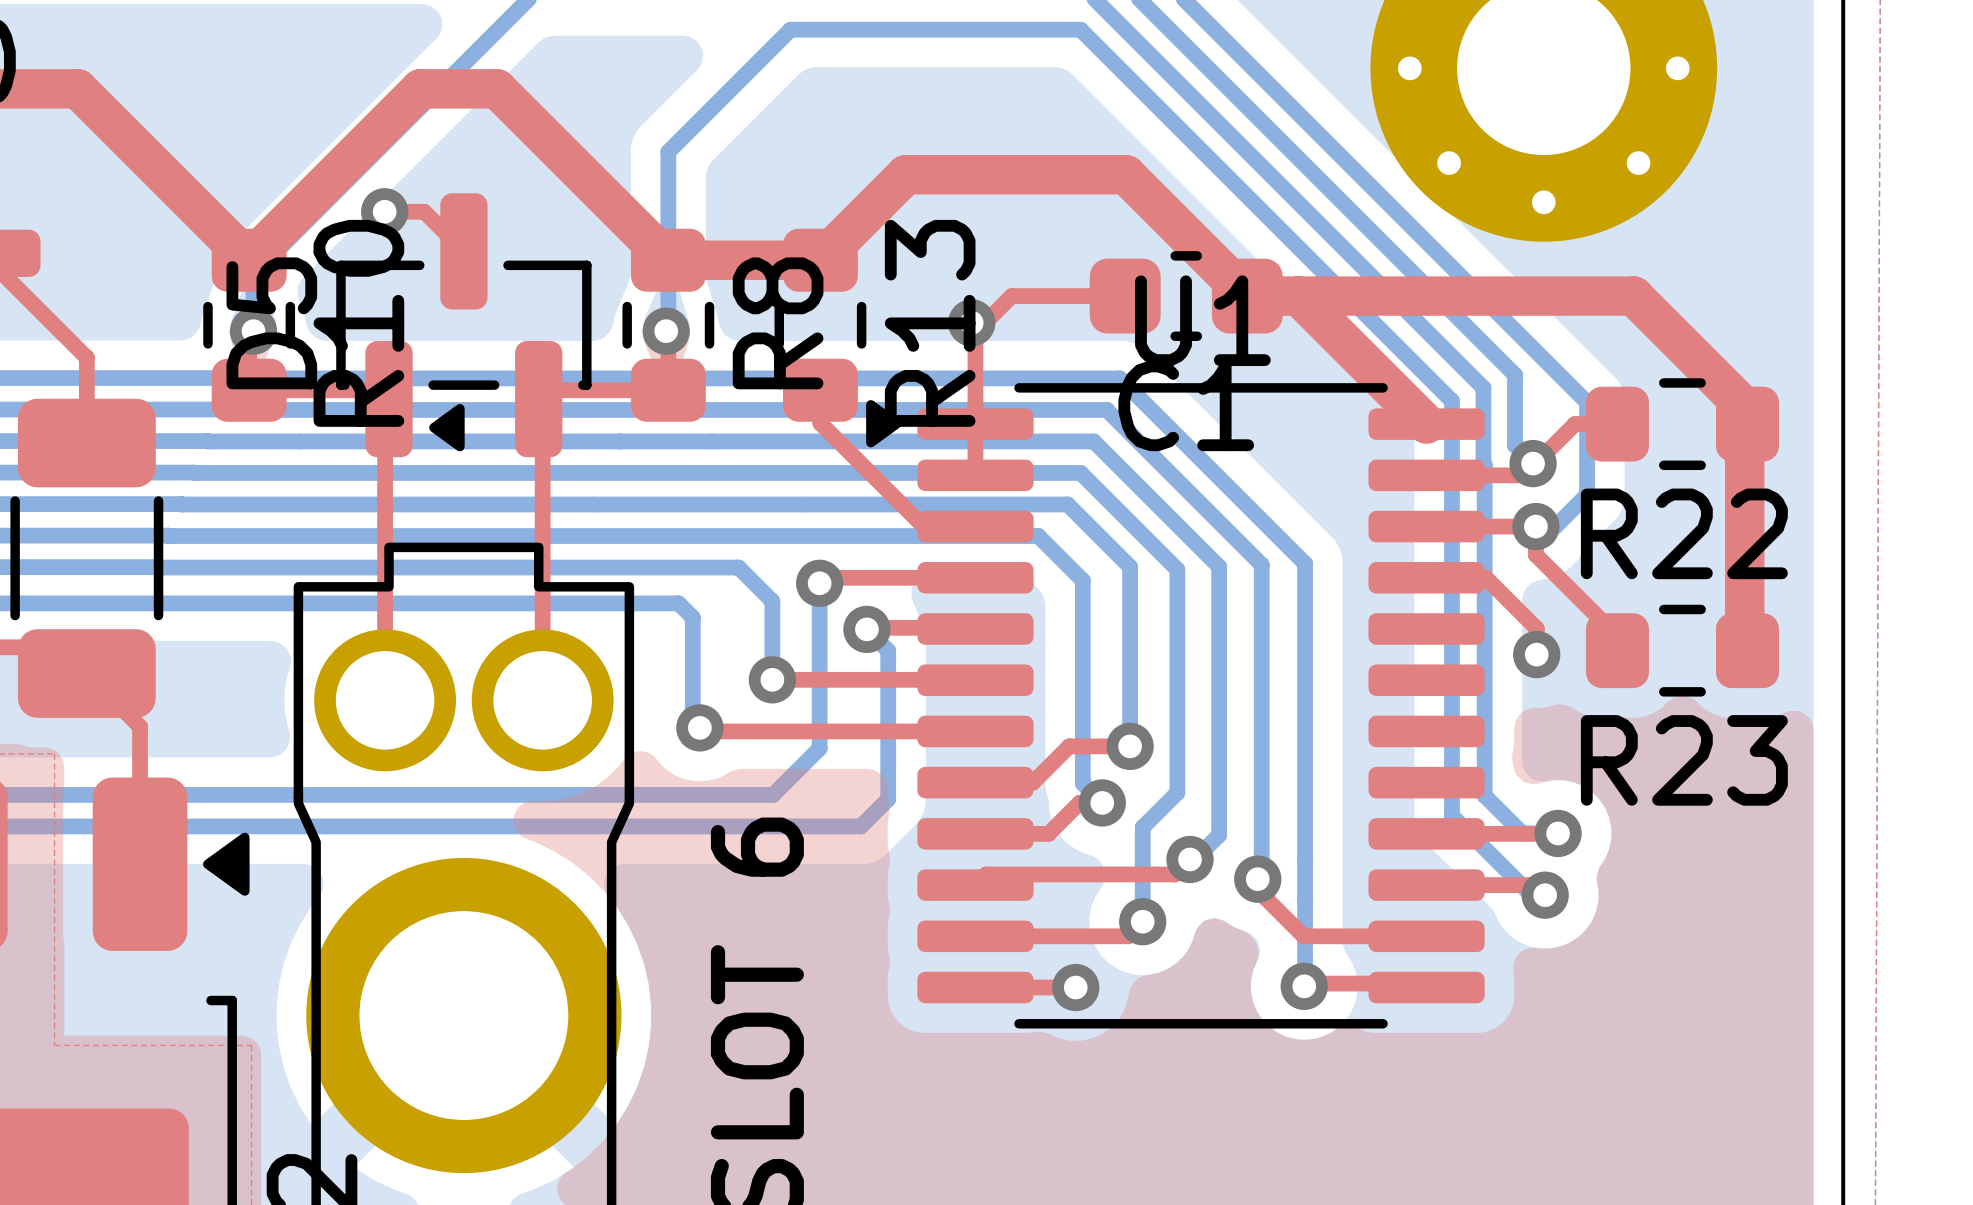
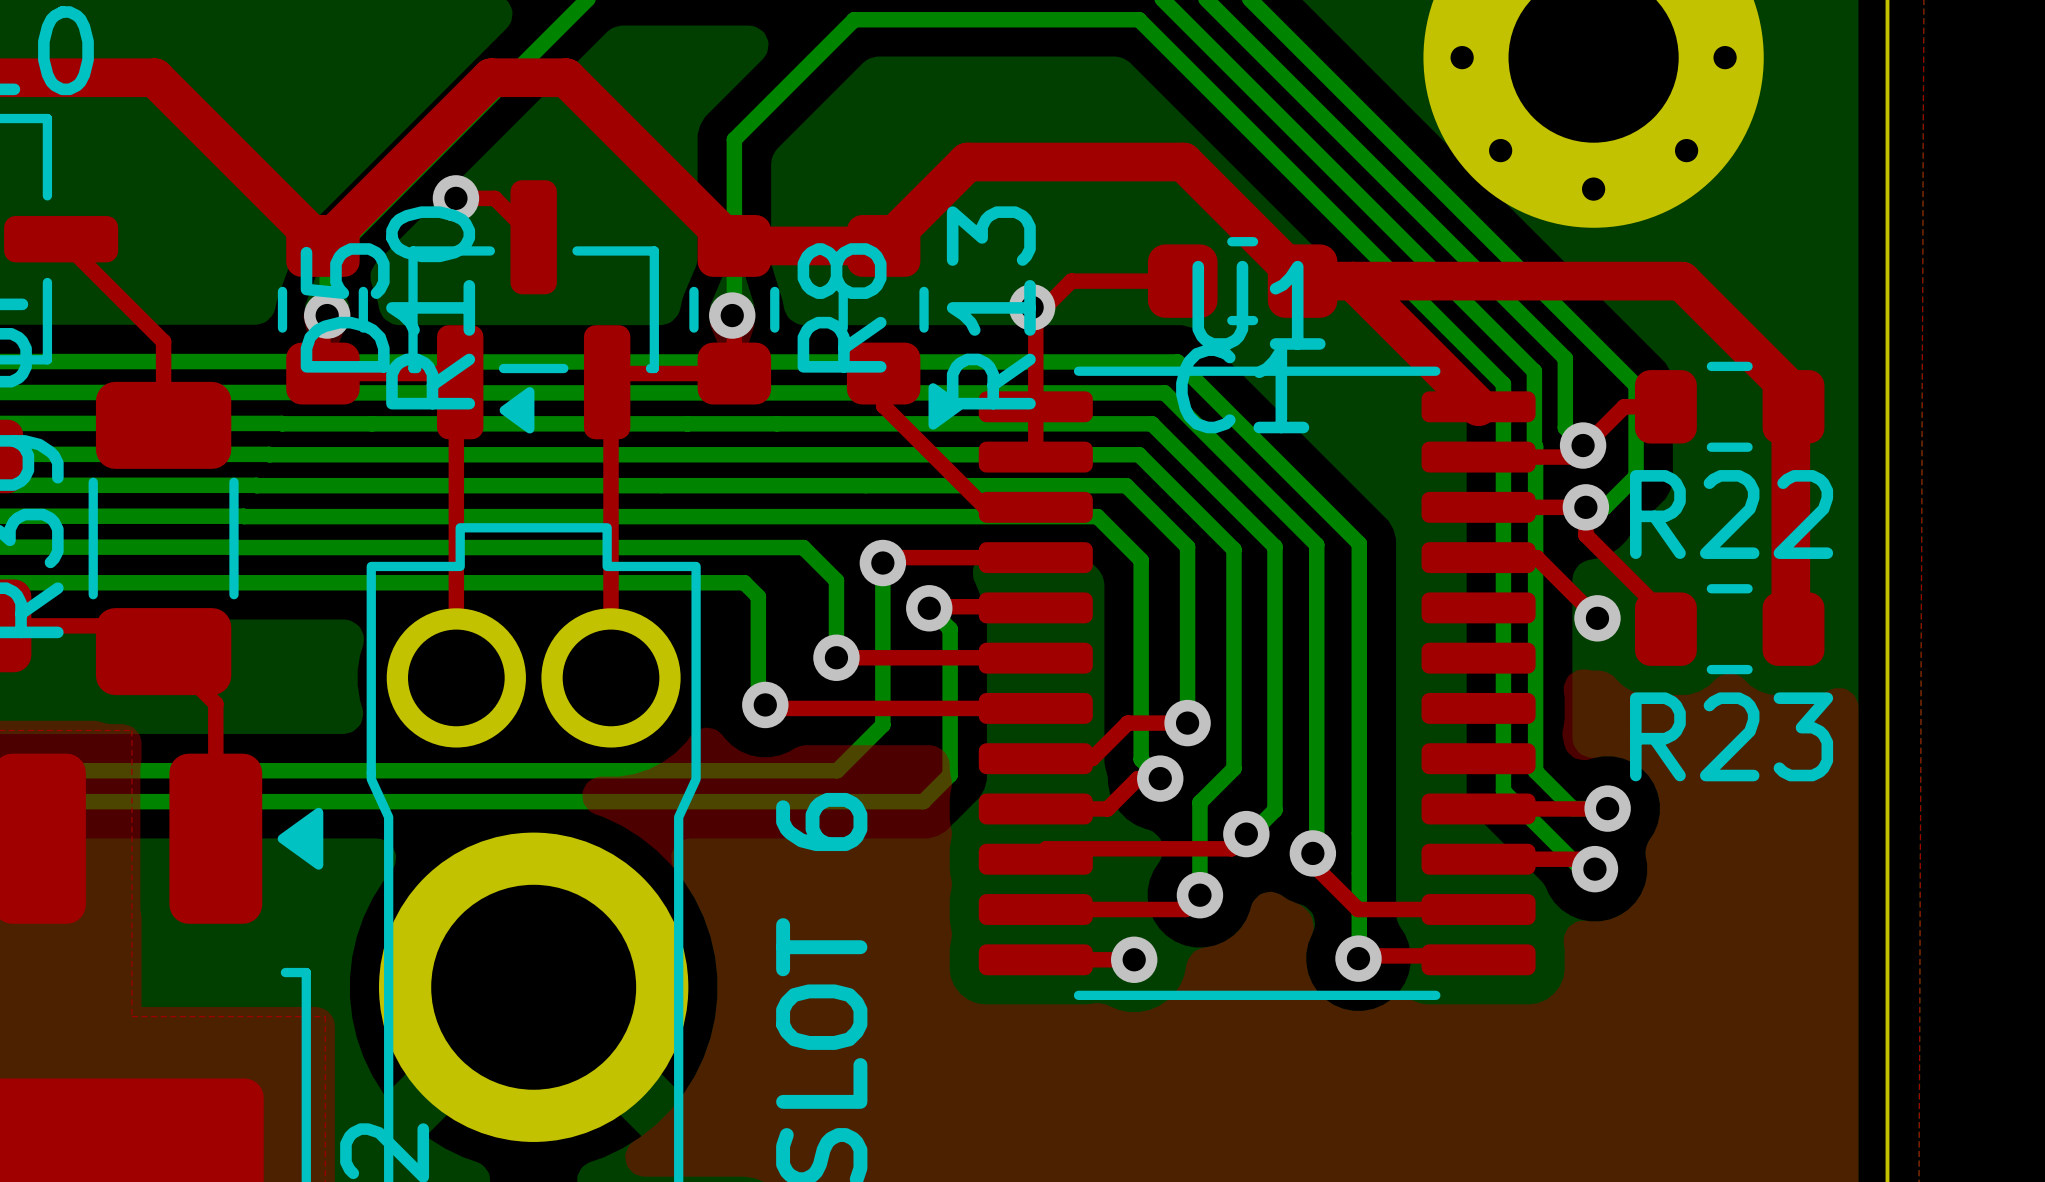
via position: (1536, 654) -> (1597, 618)

